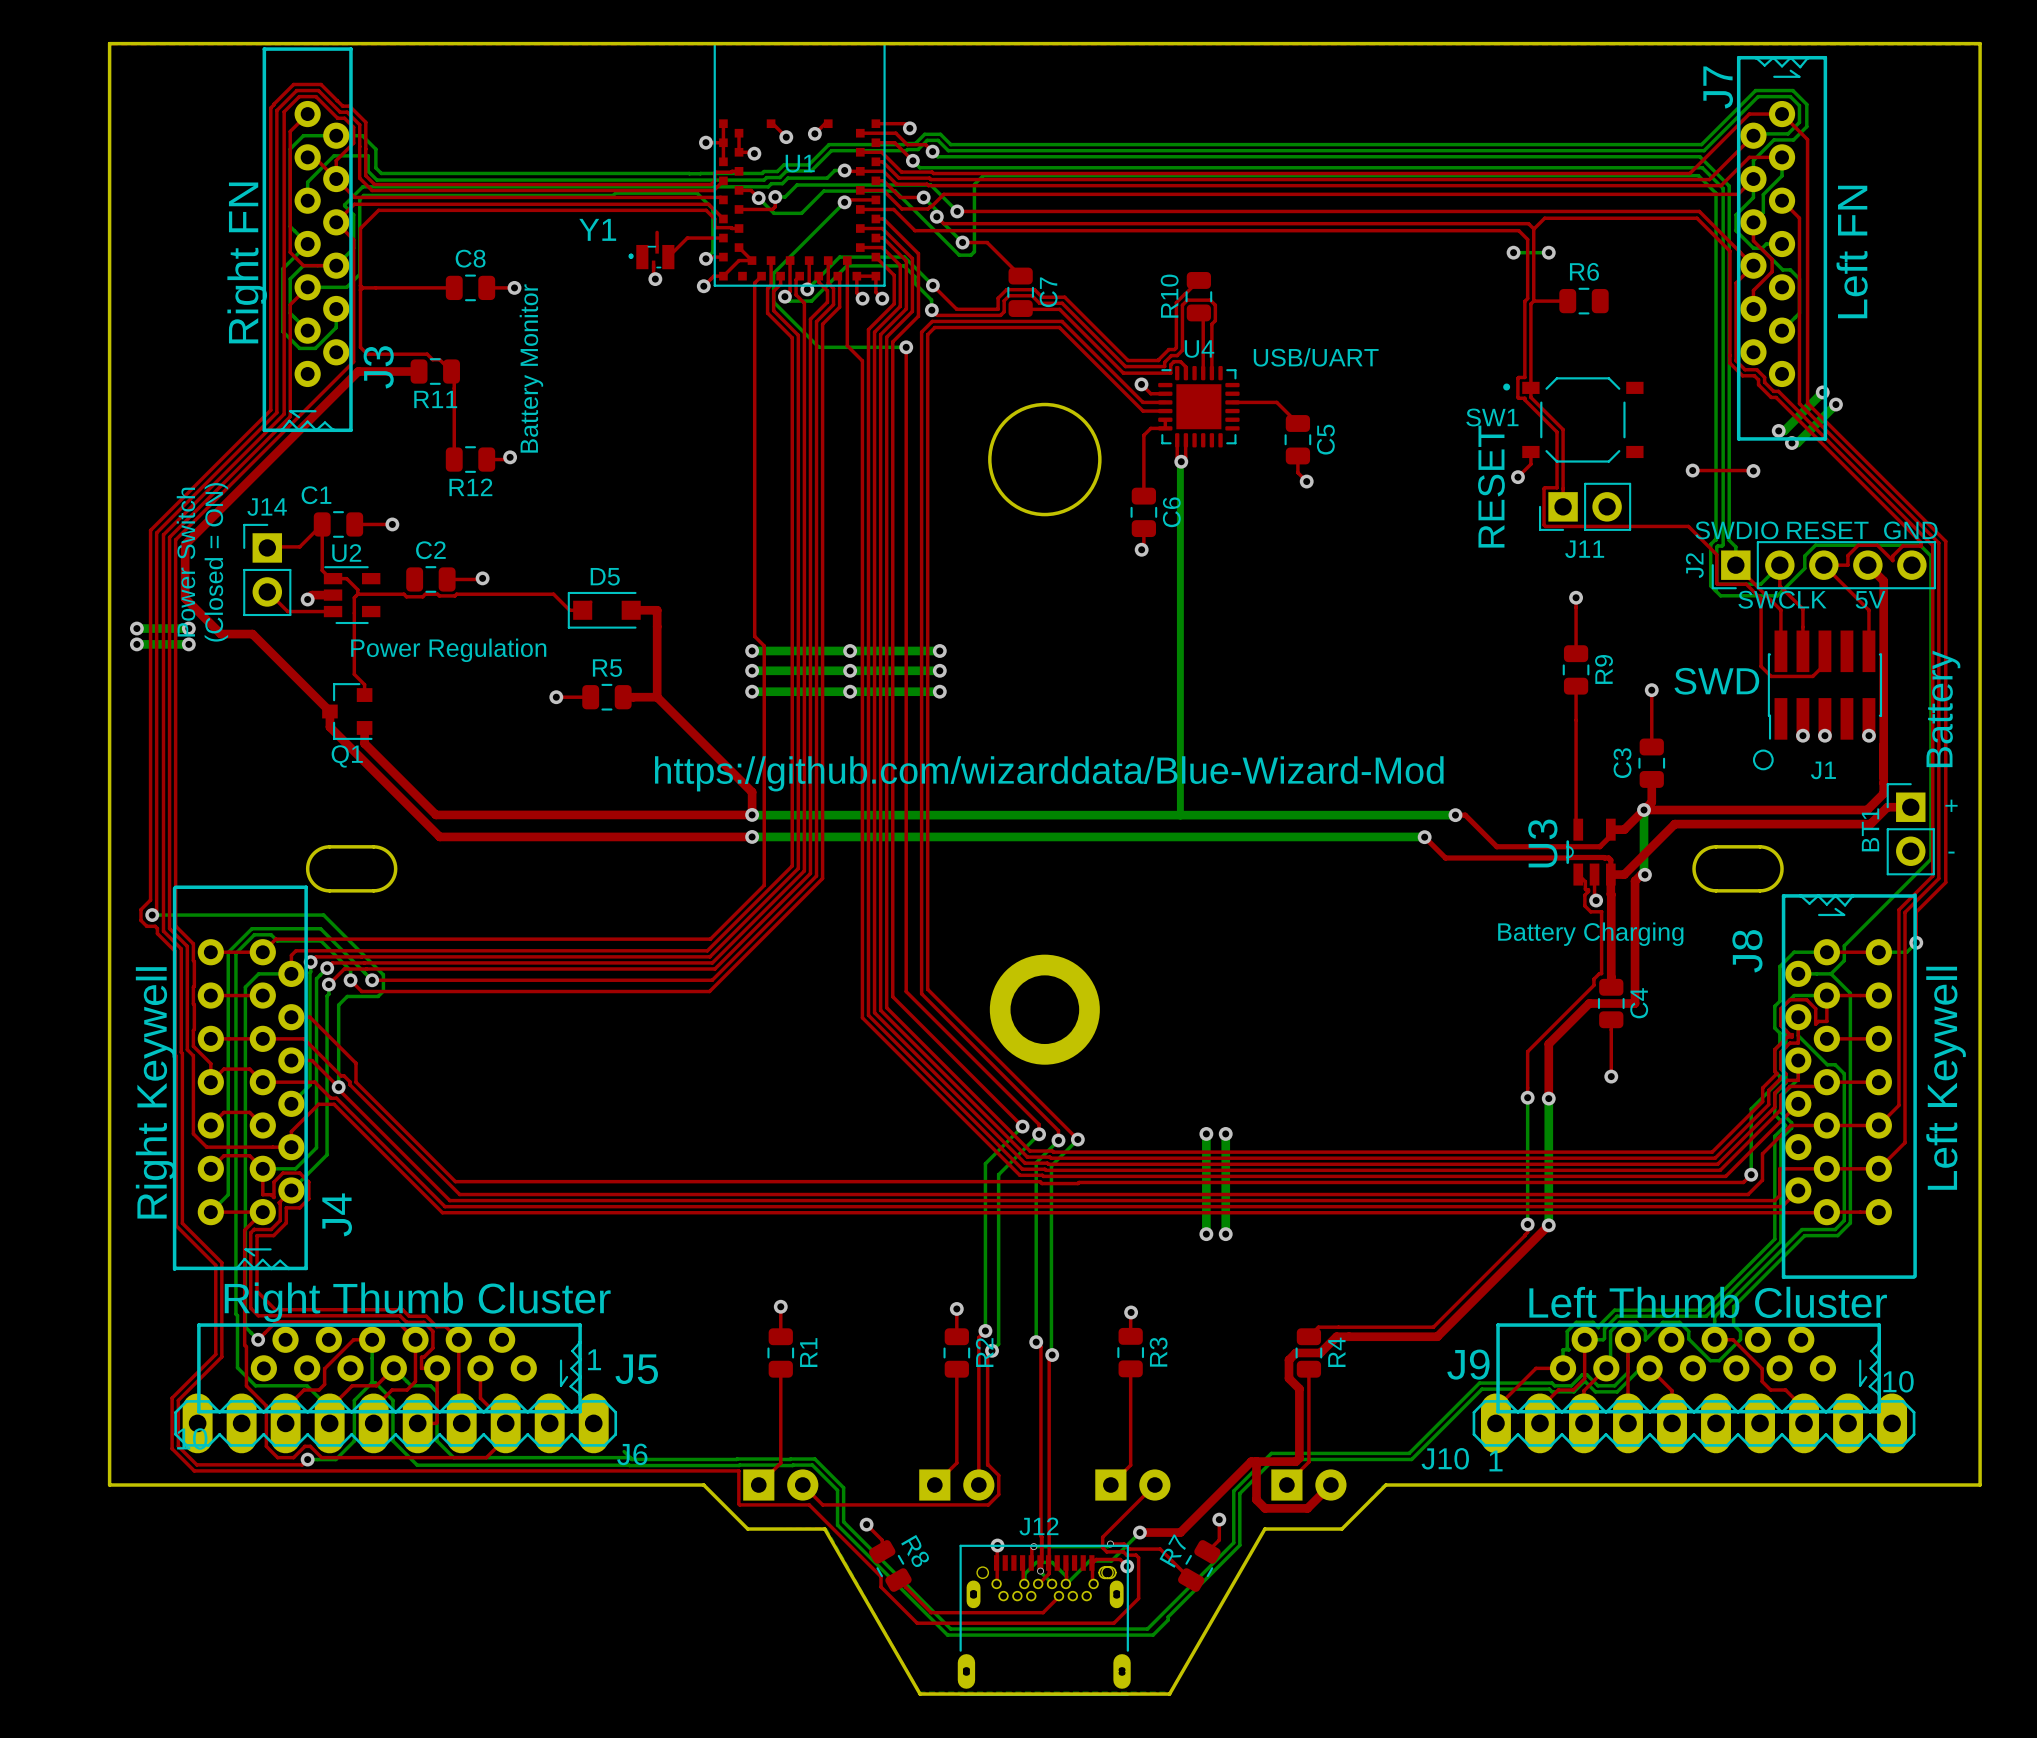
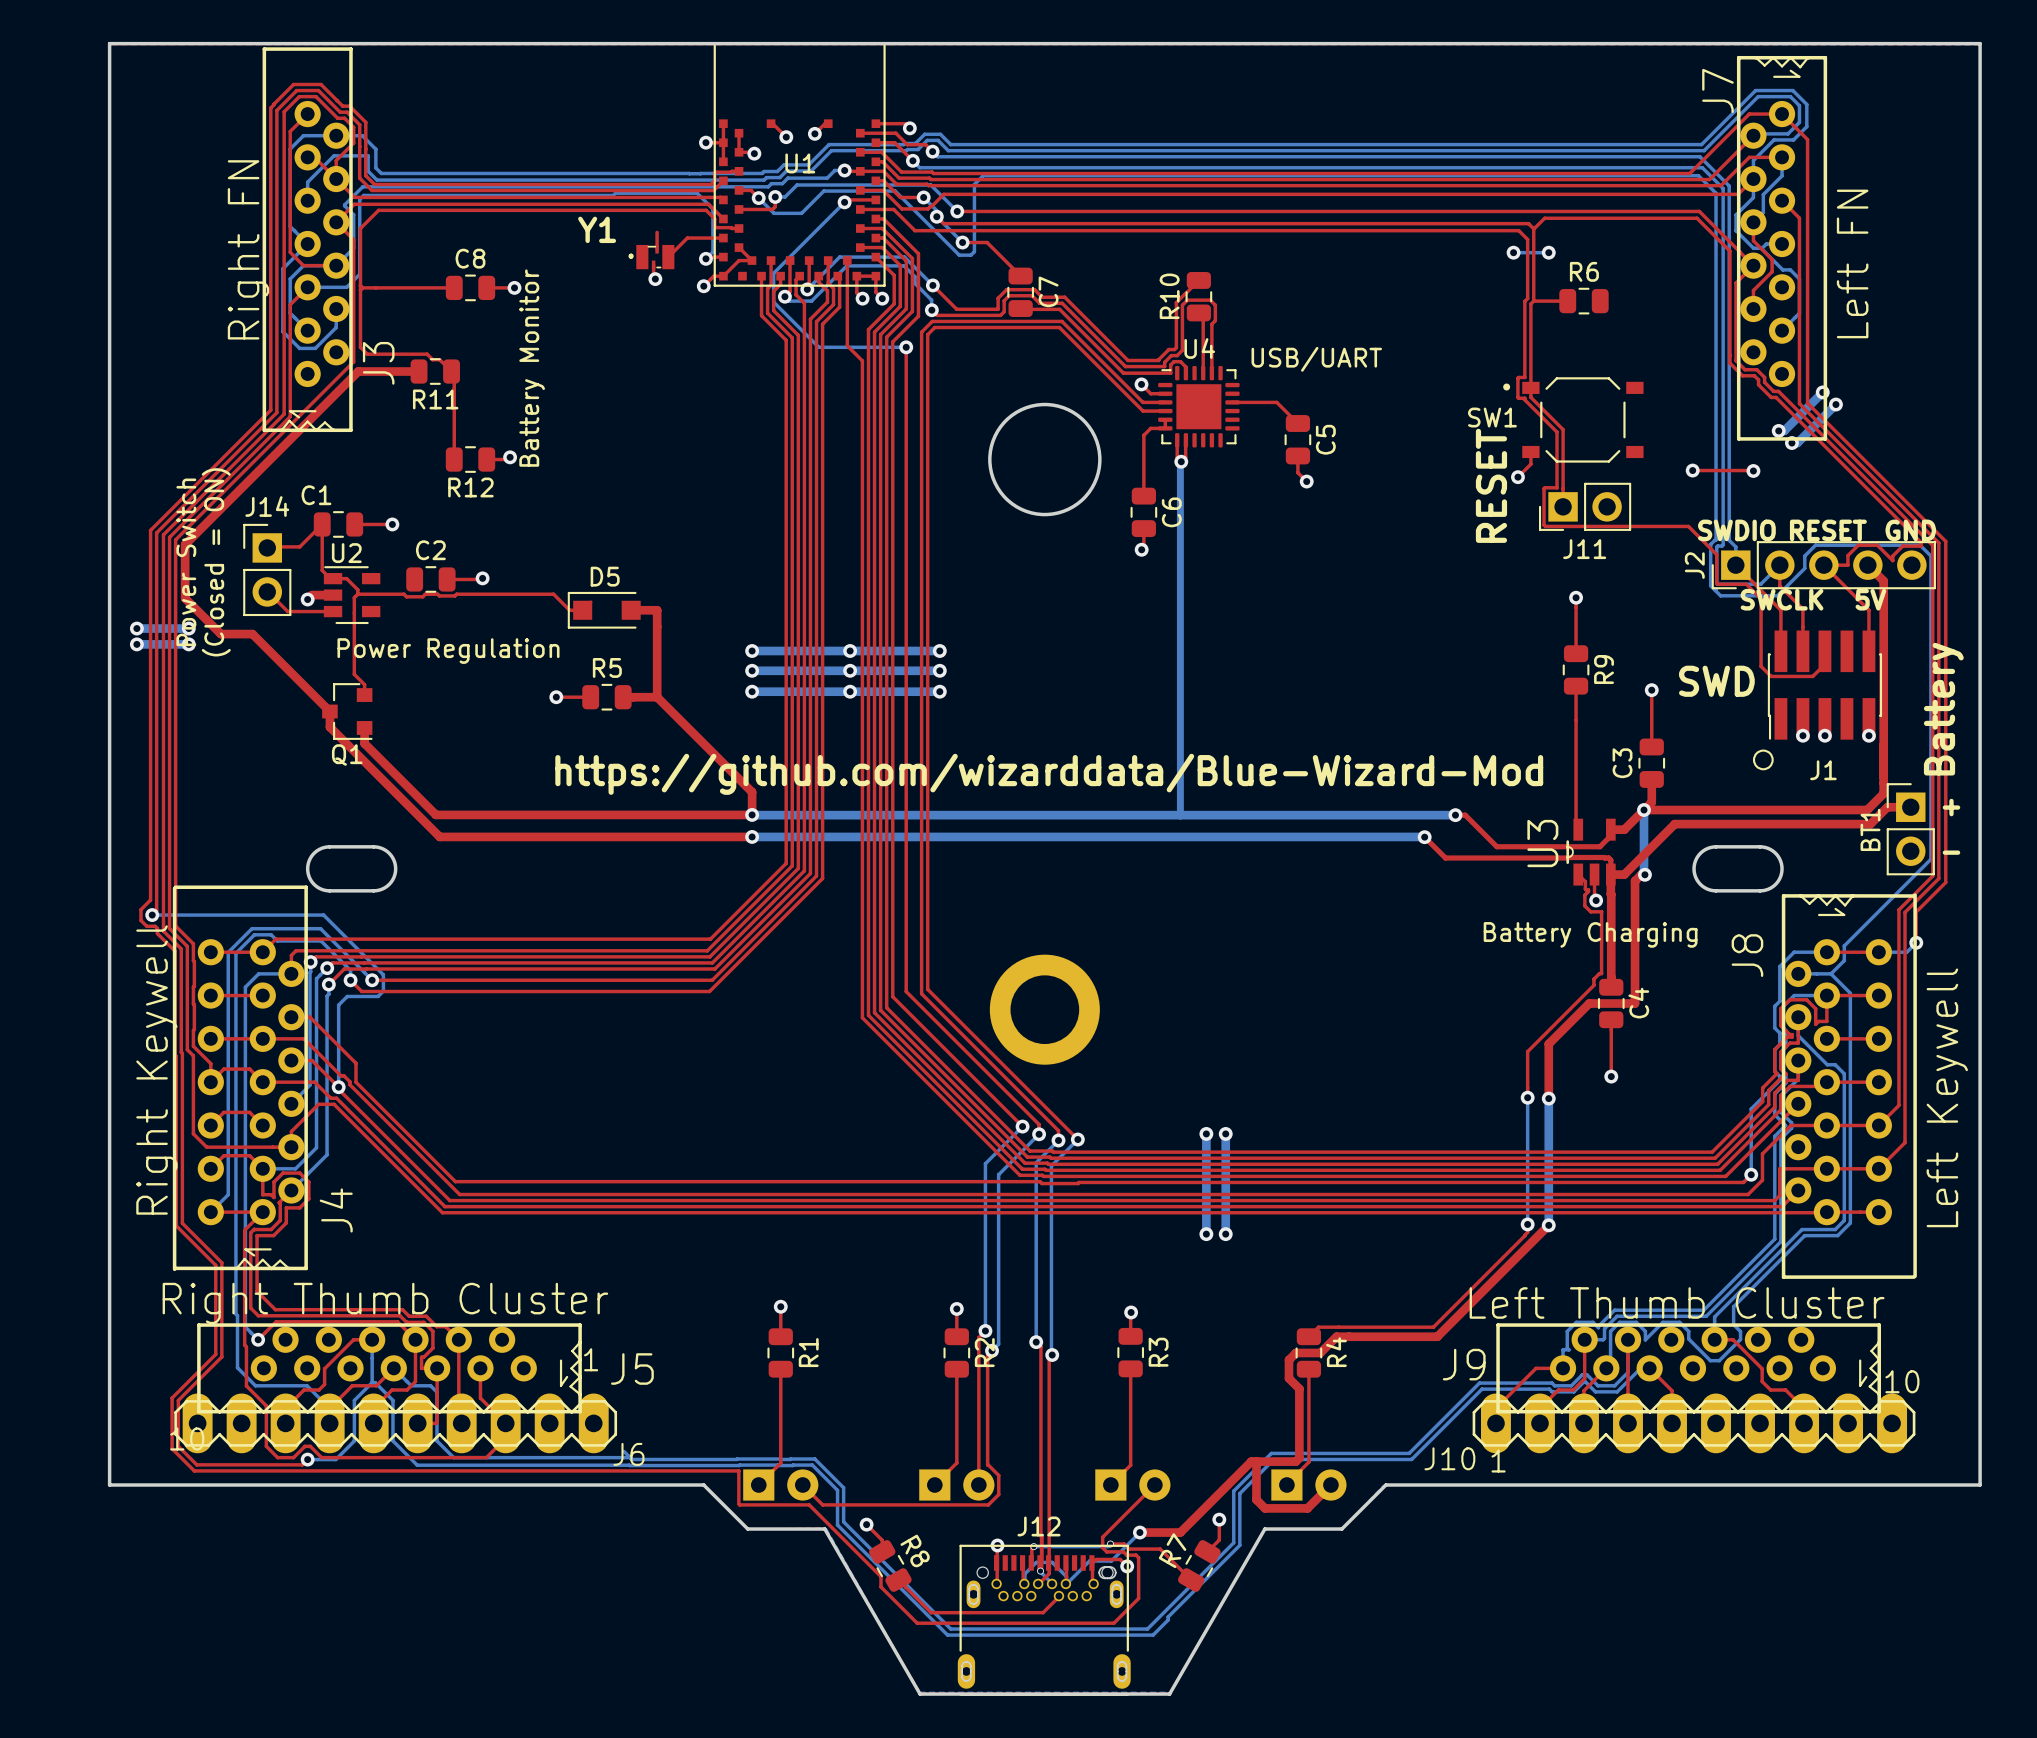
top track: (761, 276) (754, 283) (754, 636) (764, 645) (764, 885) -> (761, 276) (761, 315) (786, 340) (786, 863) (764, 885)

